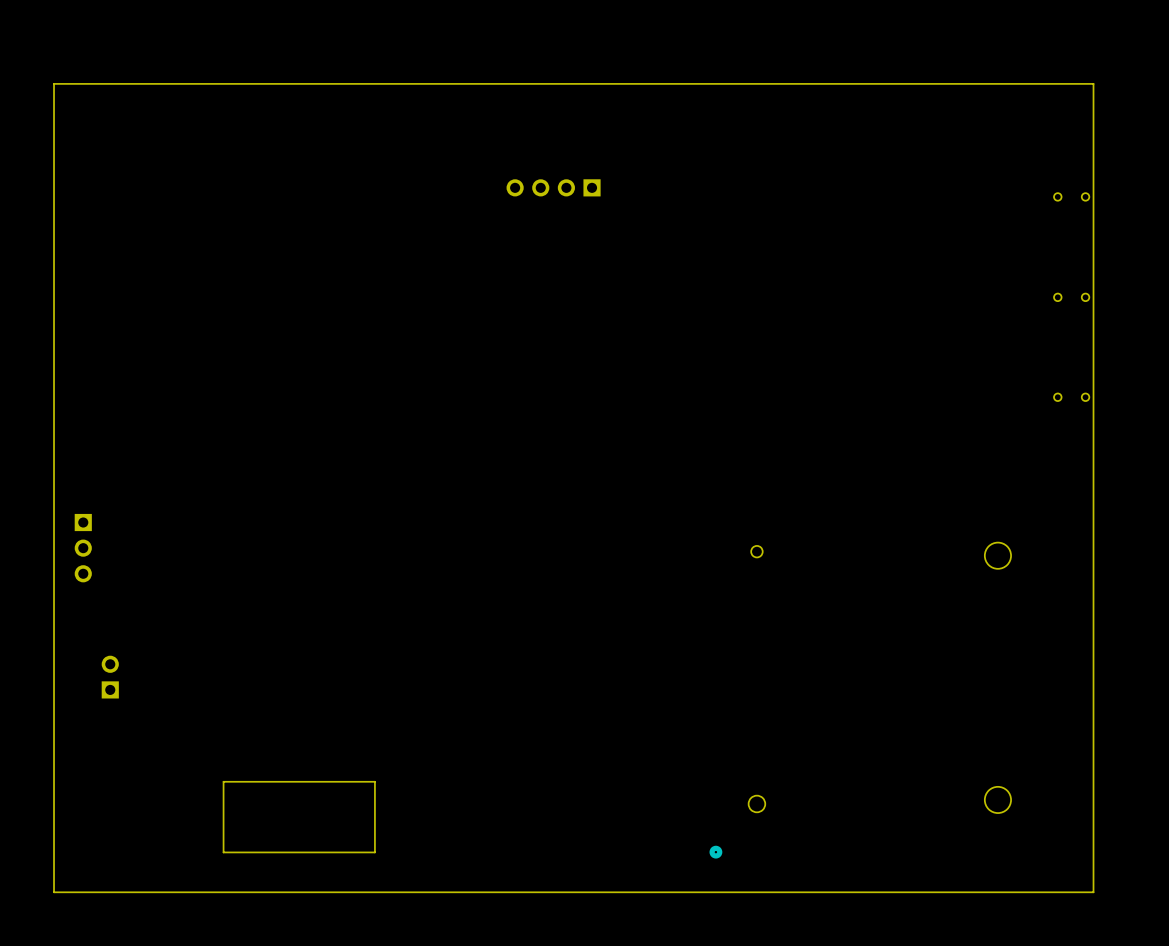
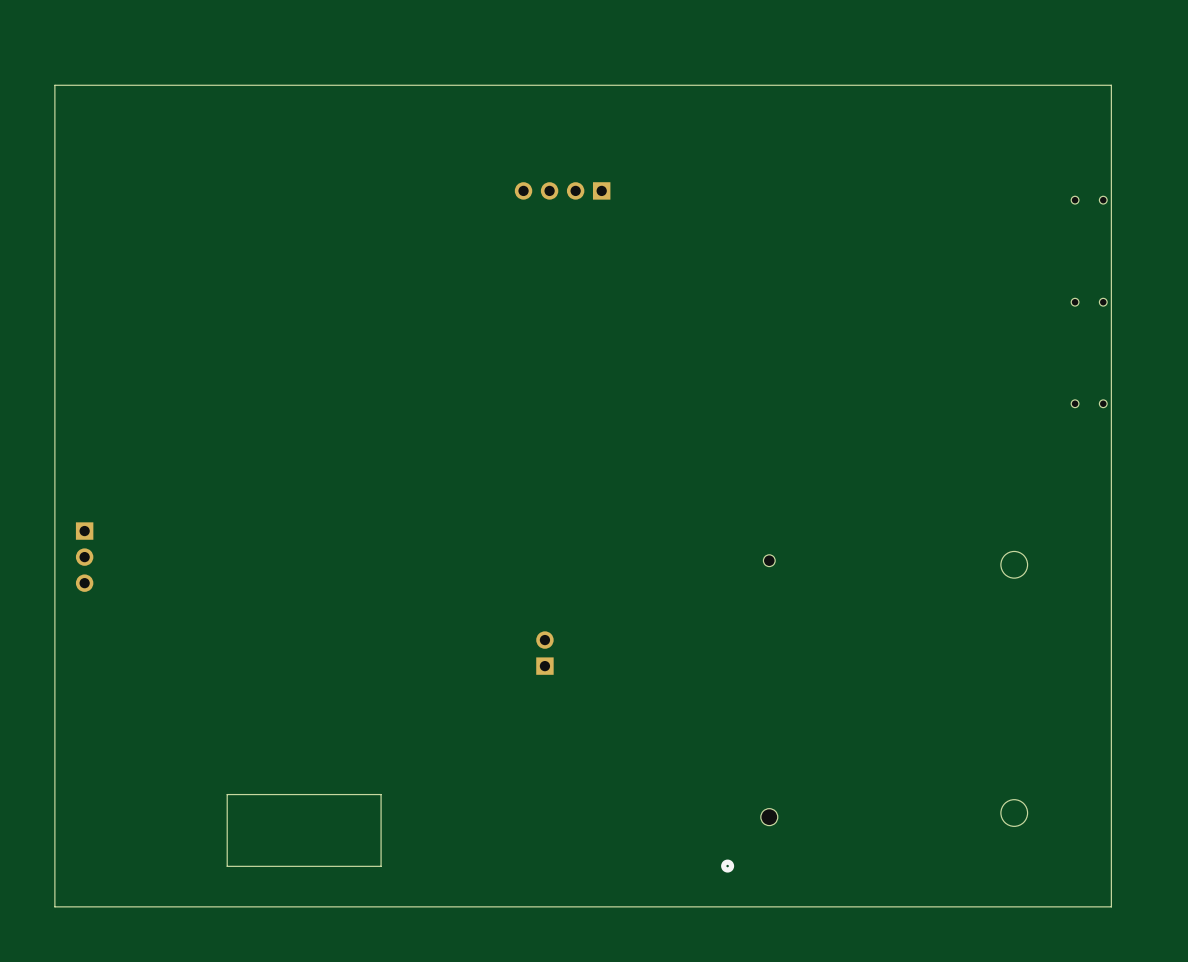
part: none -> (544, 653)
part: (110, 677) -> none

